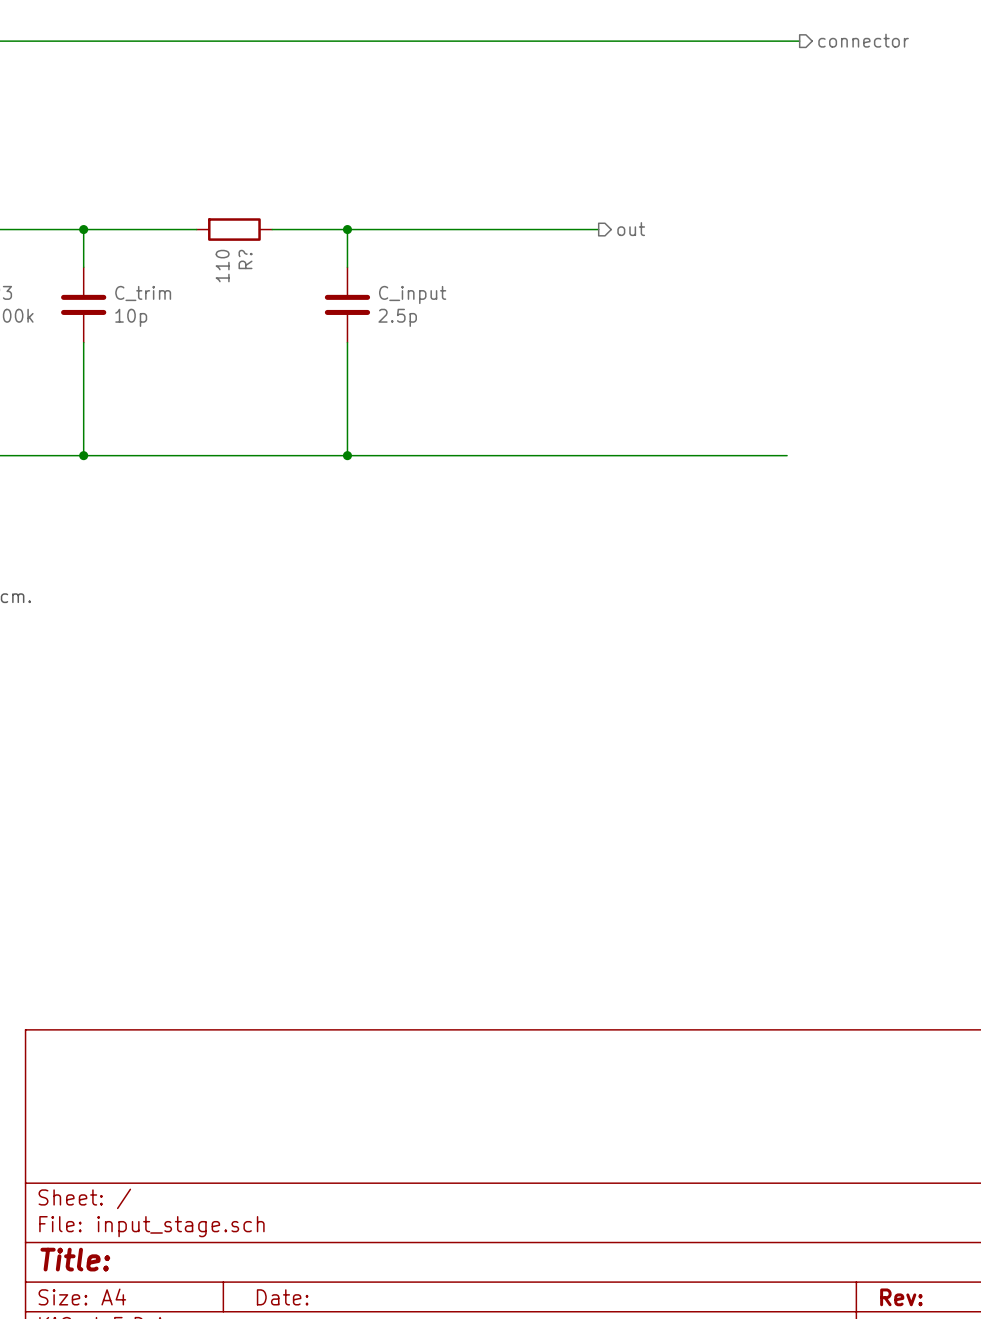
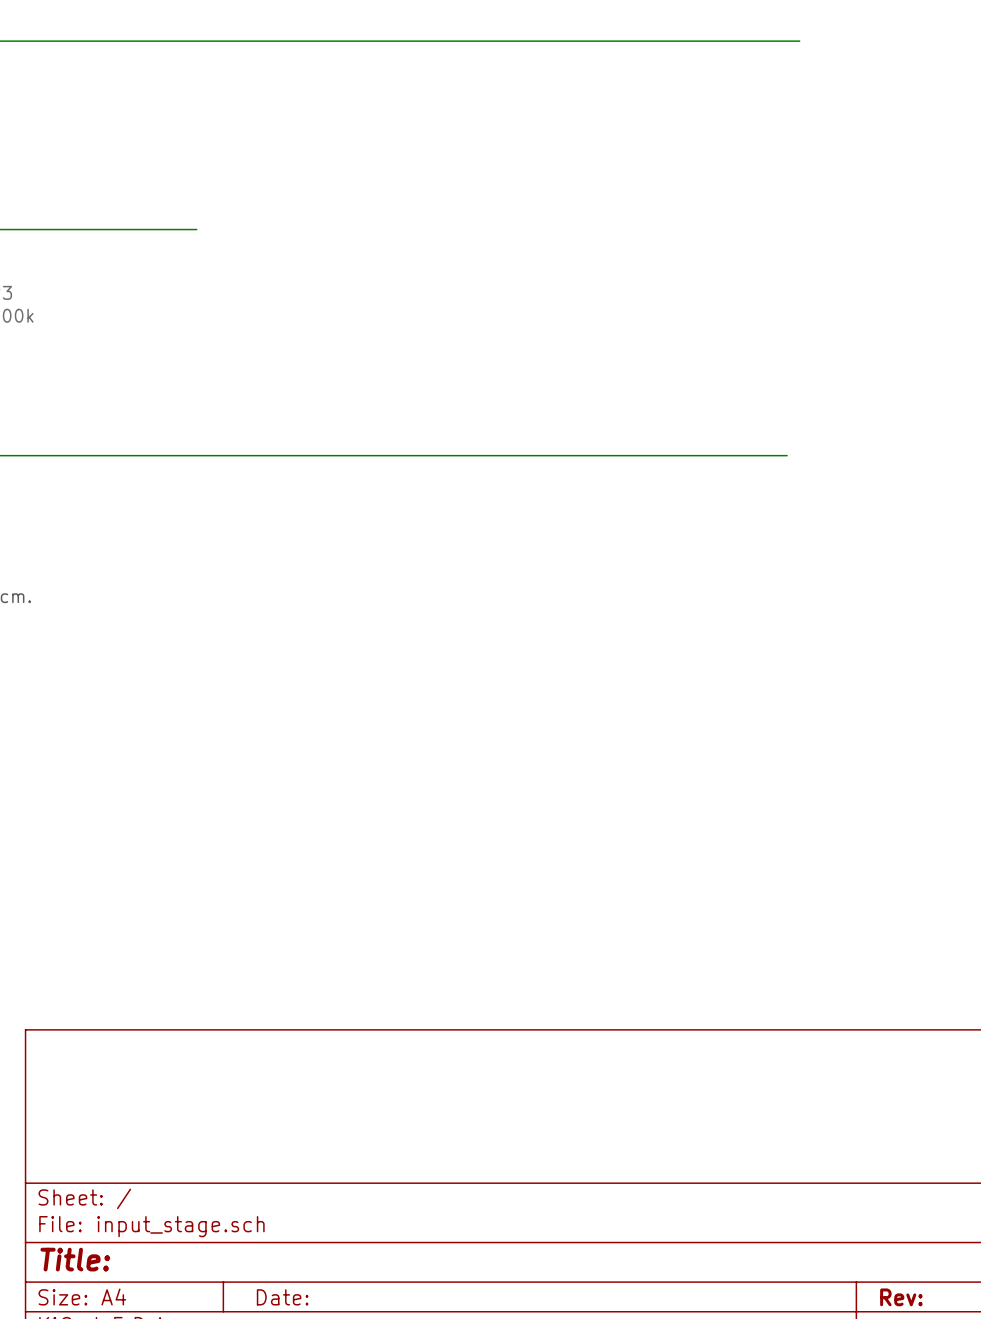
hierarchical label: connector (863, 40) -> none
wire: (83, 229) (83, 267) -> none
junction: (83, 229) -> none
R?: 110 (234, 229) -> none
wire: (272, 229) (598, 229) -> none
wire: (347, 229) (347, 267) -> none
junction: (347, 229) -> none
hierarchical label: out (631, 229) -> none
C_trim: 10p (83, 304) -> none
C_input: 2.5p (347, 304) -> none
wire: (83, 342) (83, 455) -> none
wire: (347, 342) (347, 455) -> none
junction: (83, 455) -> none
junction: (347, 455) -> none

